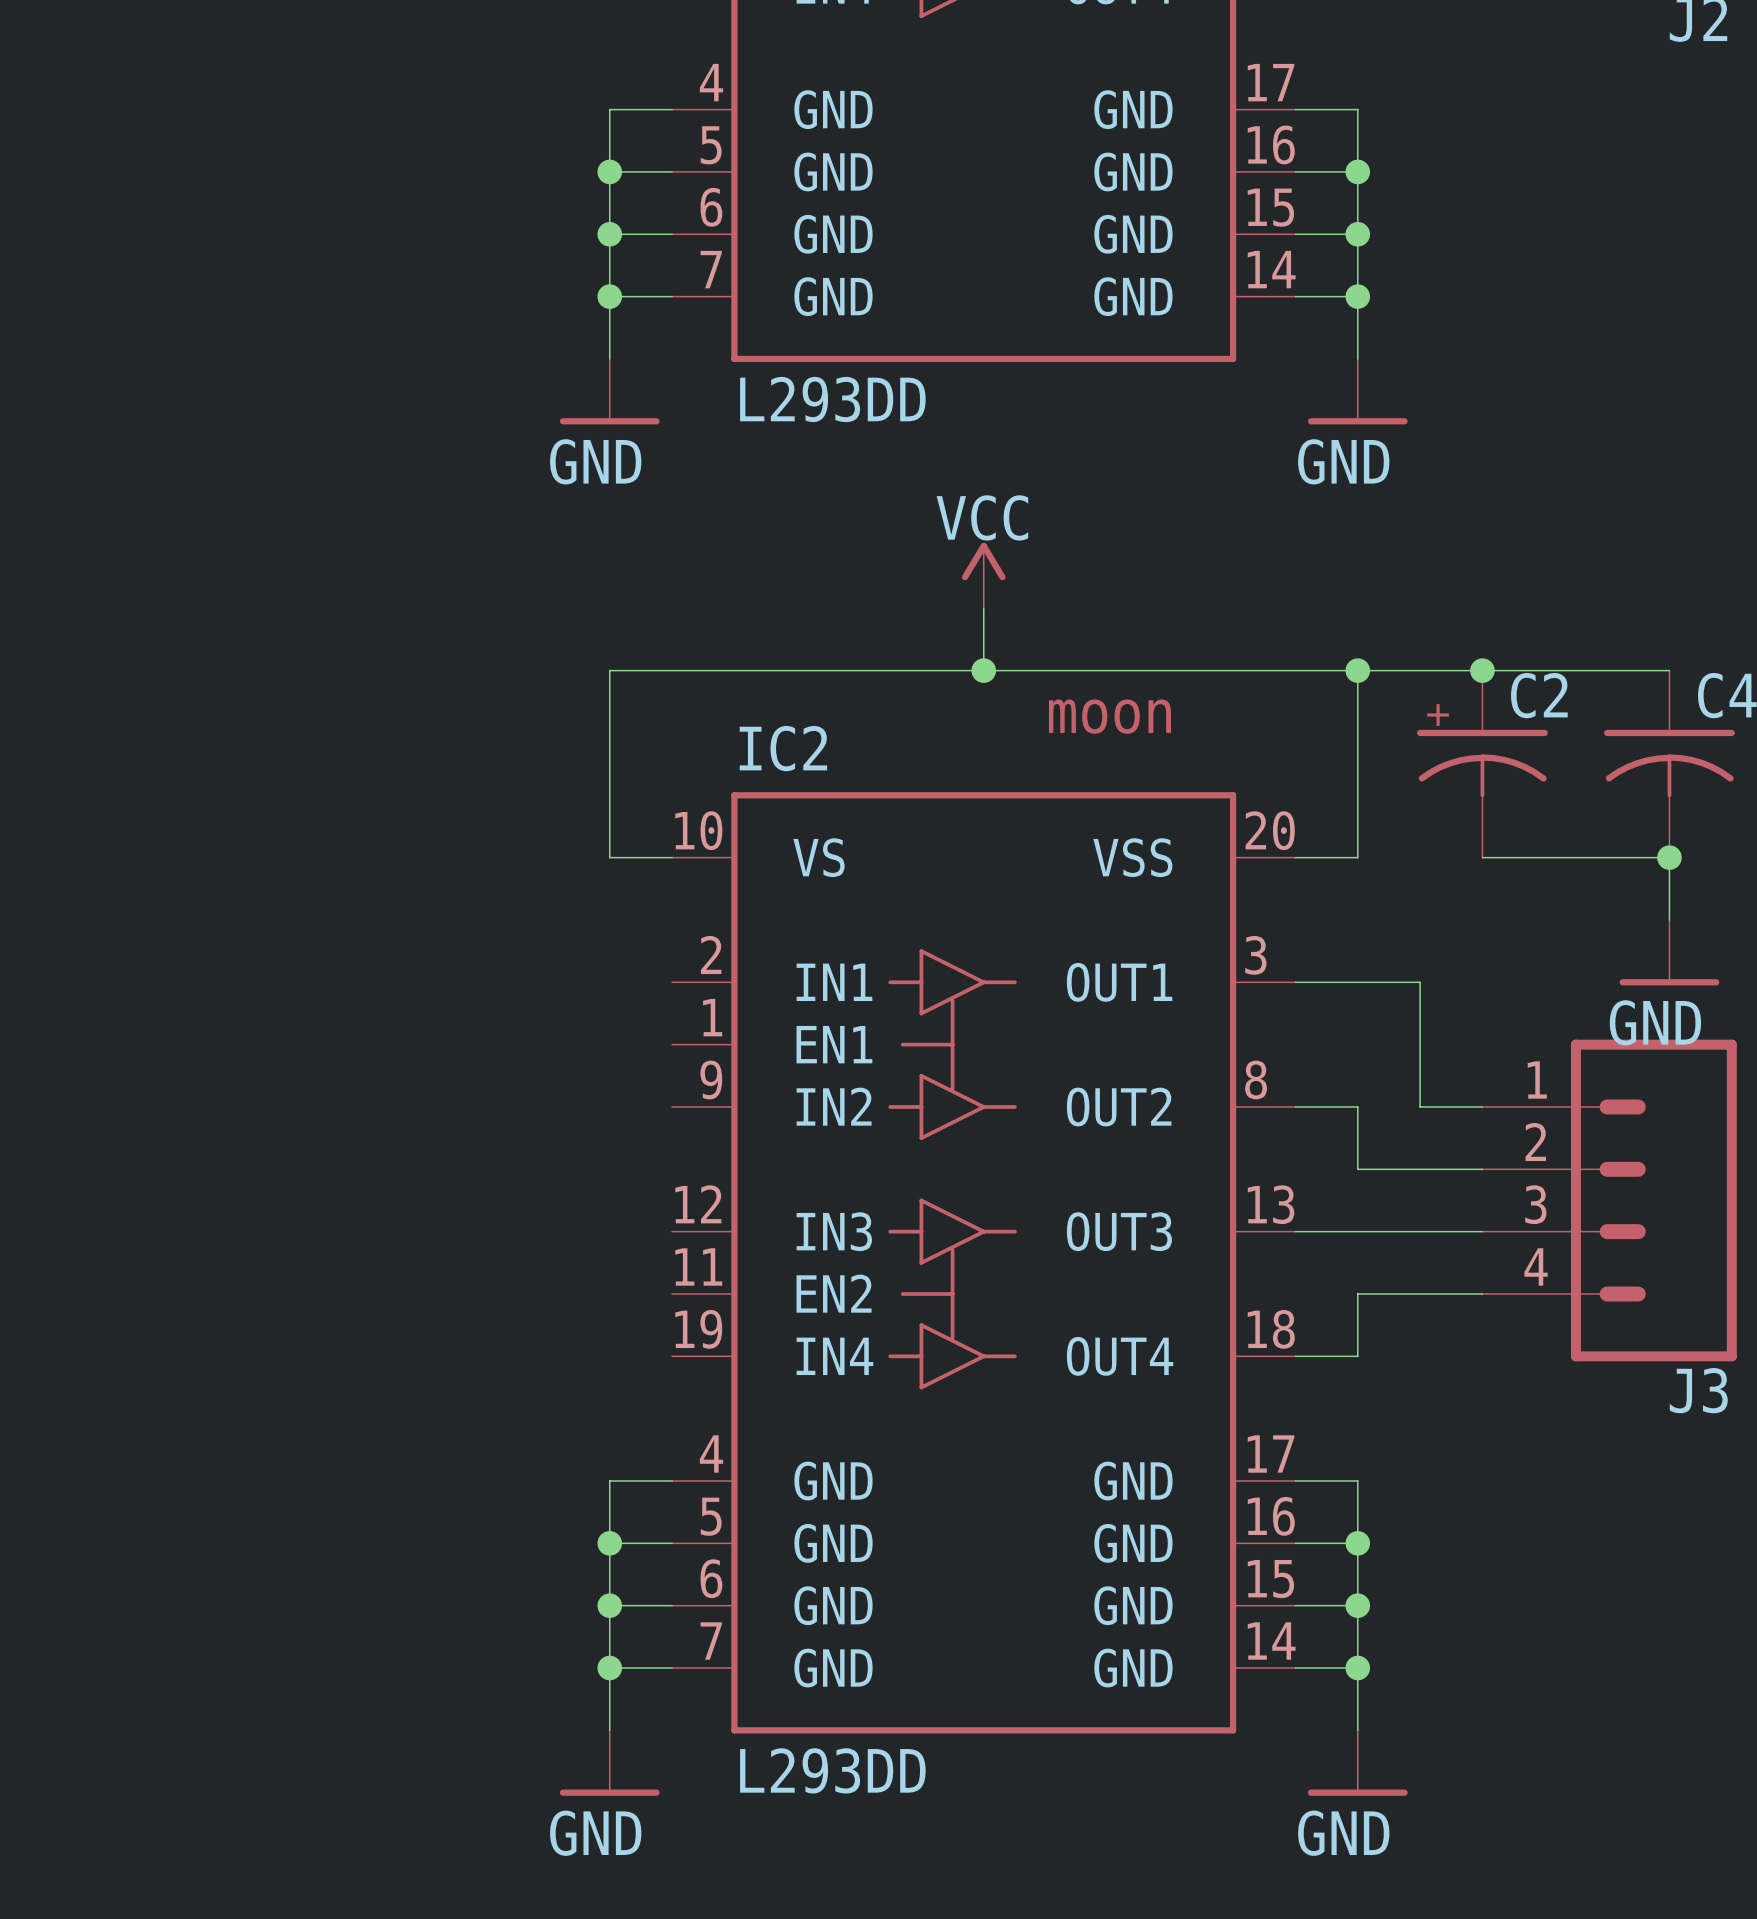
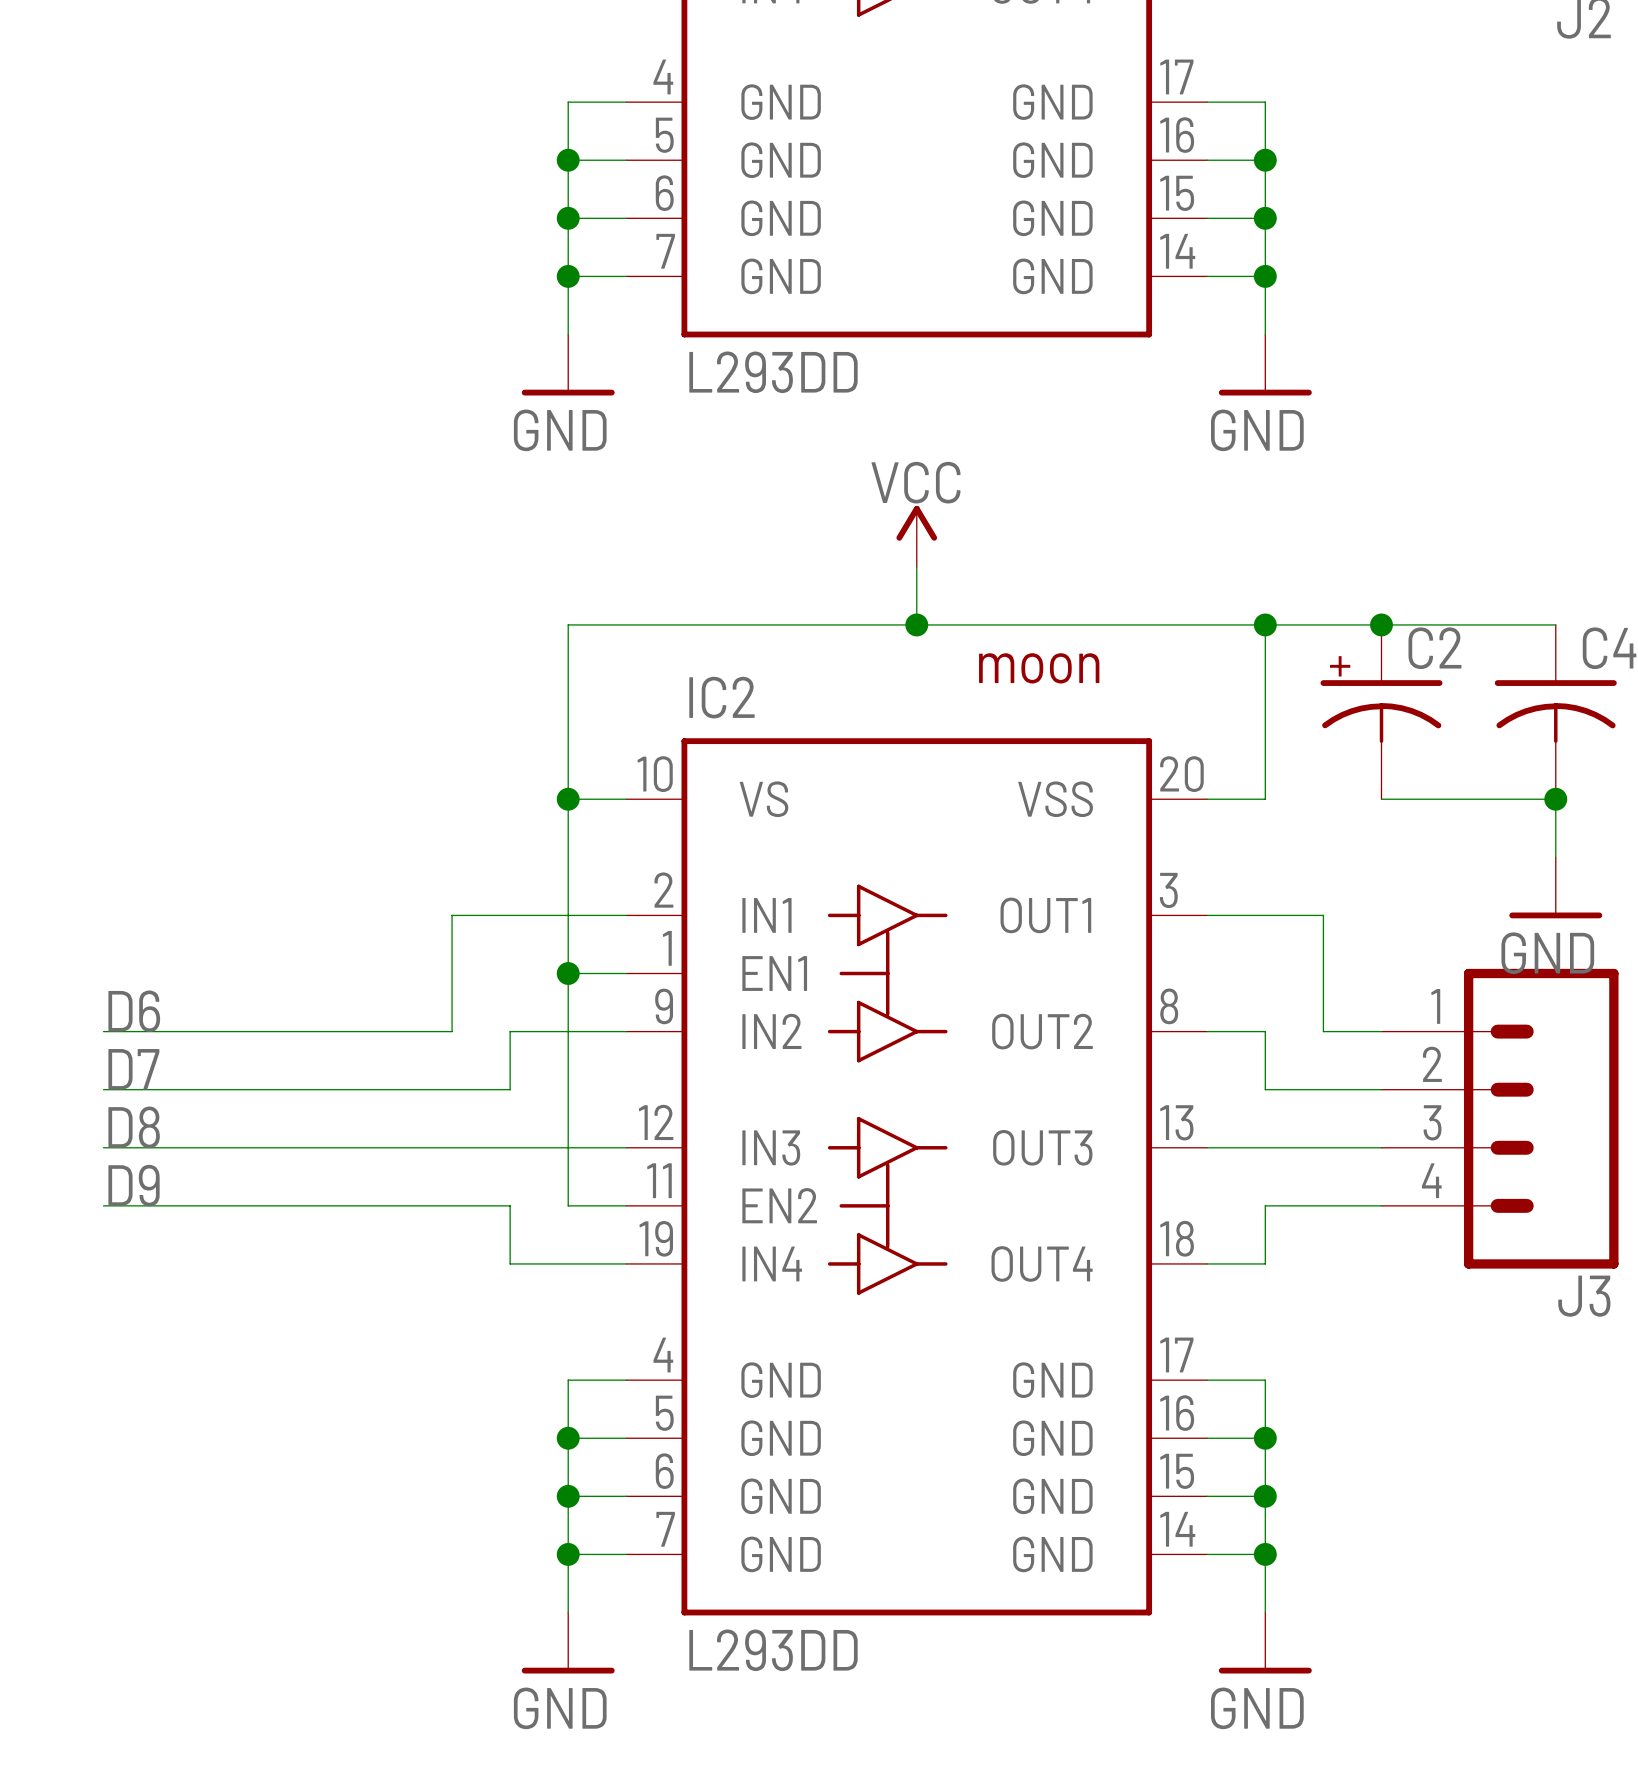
wire: none -> (568, 799) (568, 1205) (626, 1205)
junction: none -> (568, 799)
wire: none -> (626, 915) (452, 915) (452, 1031) (103, 1031)
wire: none -> (568, 973) (626, 973)
junction: none -> (568, 973)
label: none -> D6 (134, 1011)
wire: none -> (626, 1031) (510, 1031) (510, 1089) (103, 1089)
label: none -> D7 (133, 1069)
label: none -> D8 (134, 1127)
wire: none -> (103, 1147) (626, 1147)
label: none -> D9 (134, 1185)
wire: none -> (103, 1205) (510, 1205) (510, 1263) (626, 1263)

